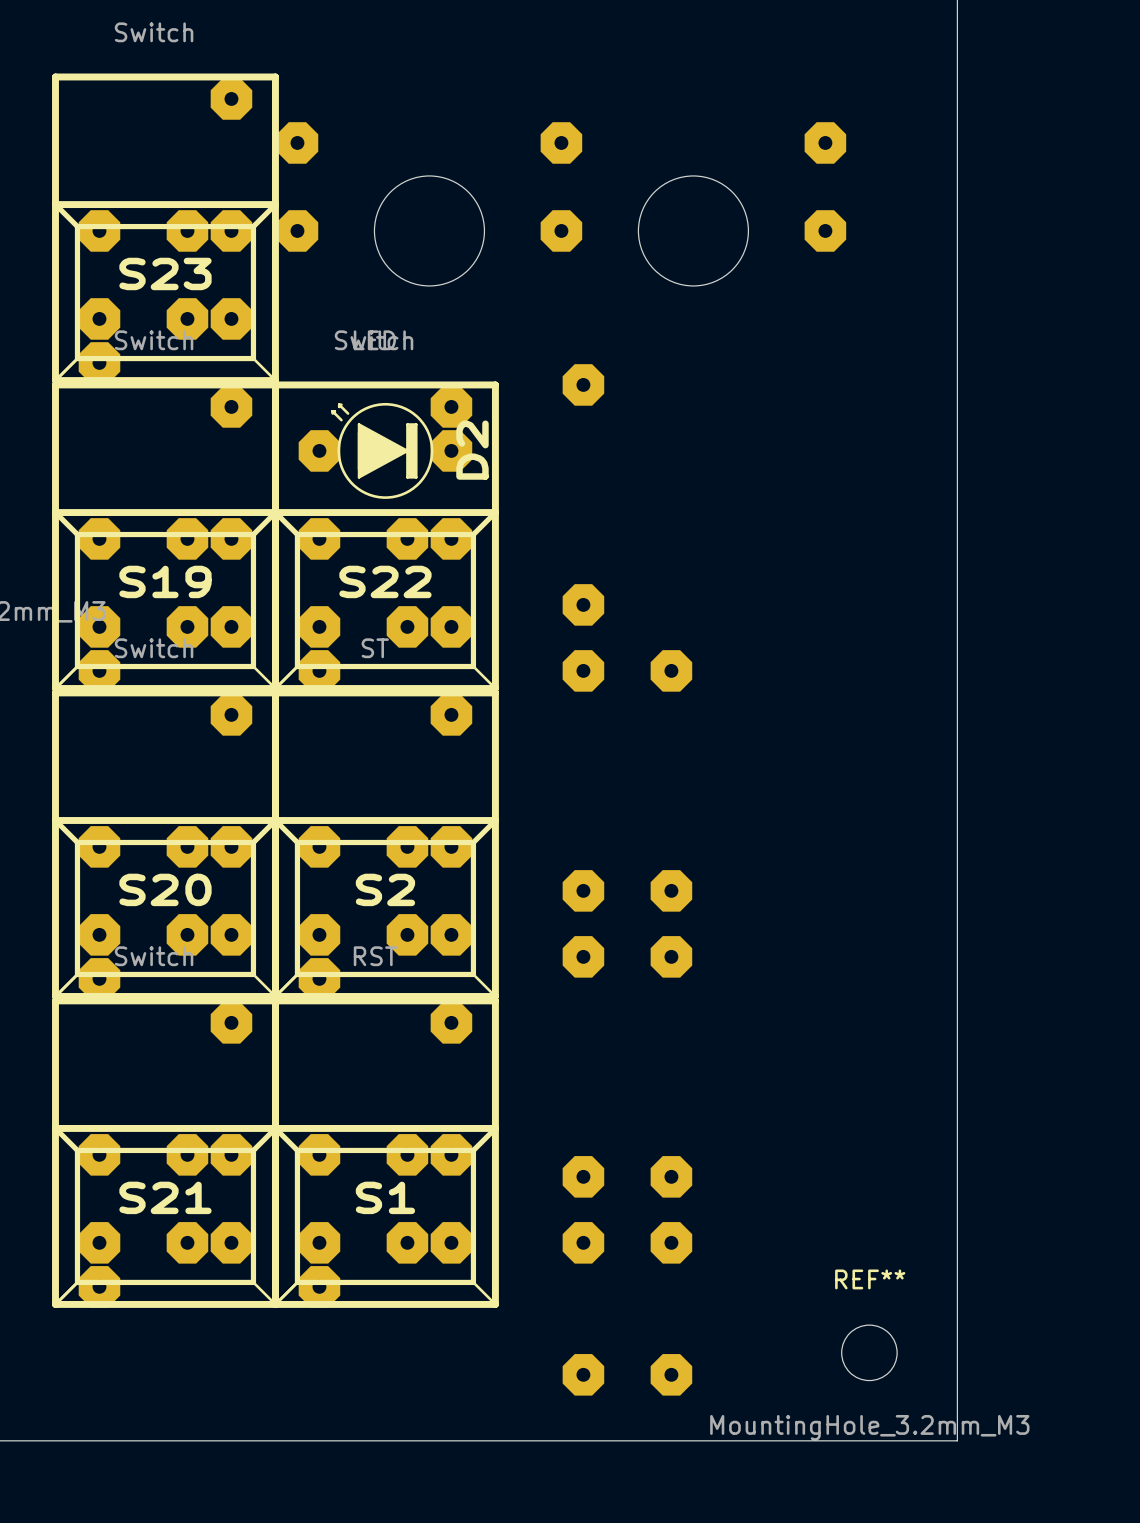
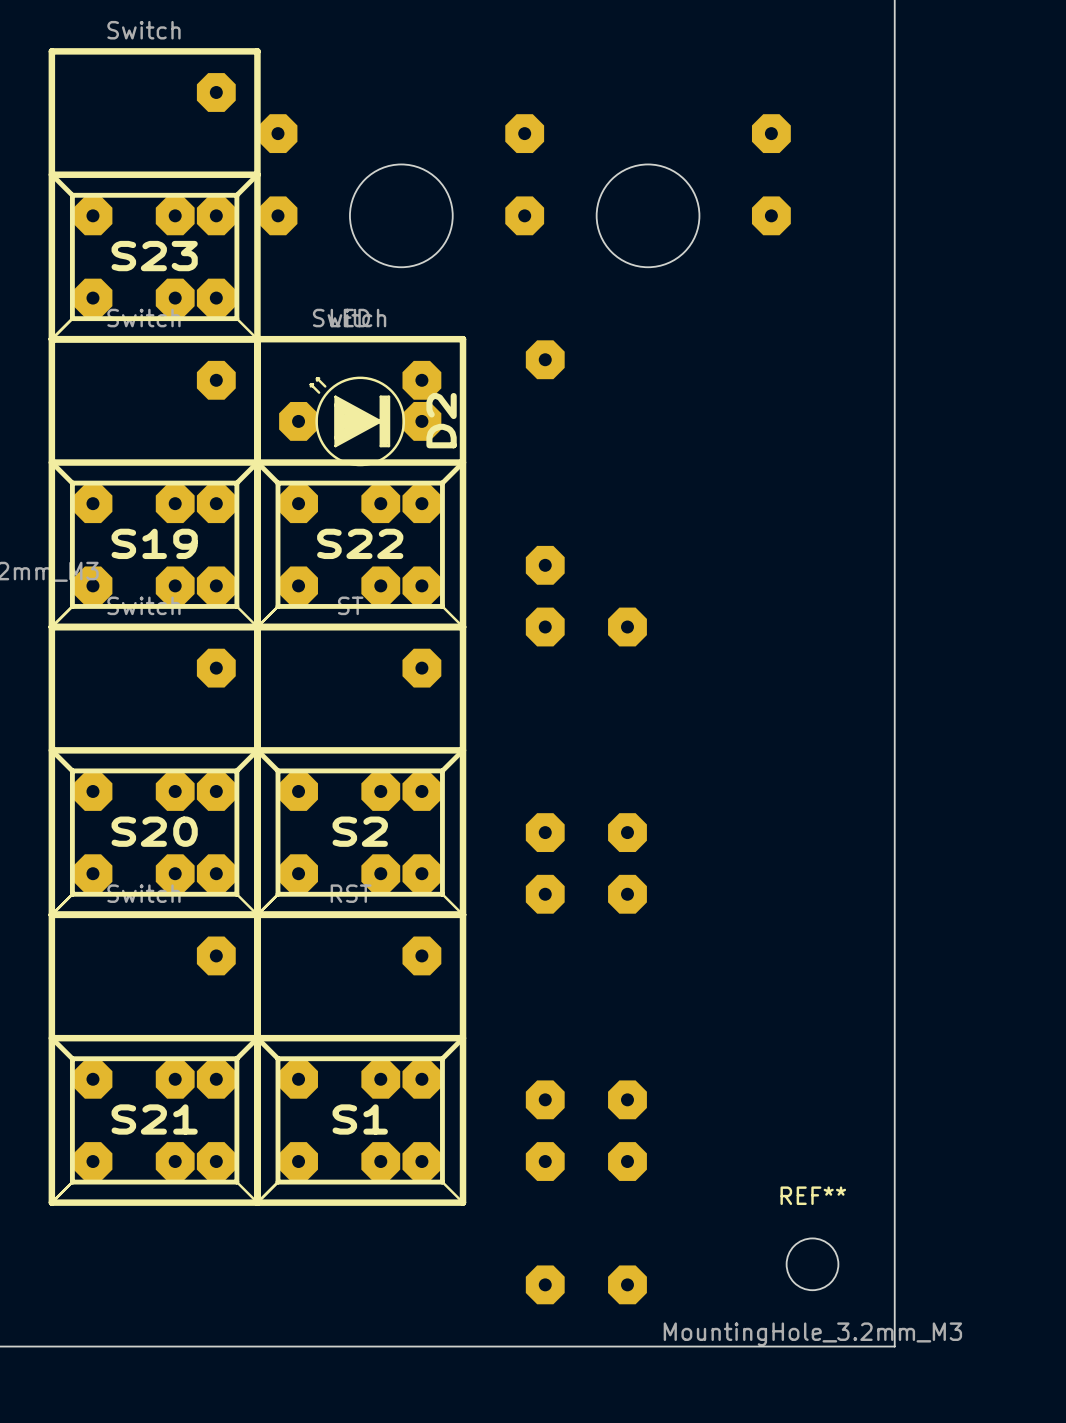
S23 footprint: [52, 73, 279, 385] -> [48, 48, 261, 343]
S19 footprint: [52, 381, 279, 692] -> [48, 335, 261, 631]
S22 footprint: [272, 381, 499, 692] -> [254, 335, 467, 631]
S20 footprint: [52, 689, 279, 1000] -> [48, 623, 261, 919]
S2 footprint: [272, 689, 499, 1000] -> [254, 623, 467, 919]
S21 footprint: [52, 997, 279, 1308] -> [48, 911, 261, 1206]
S1 footprint: [272, 997, 499, 1308] -> [254, 911, 467, 1206]

